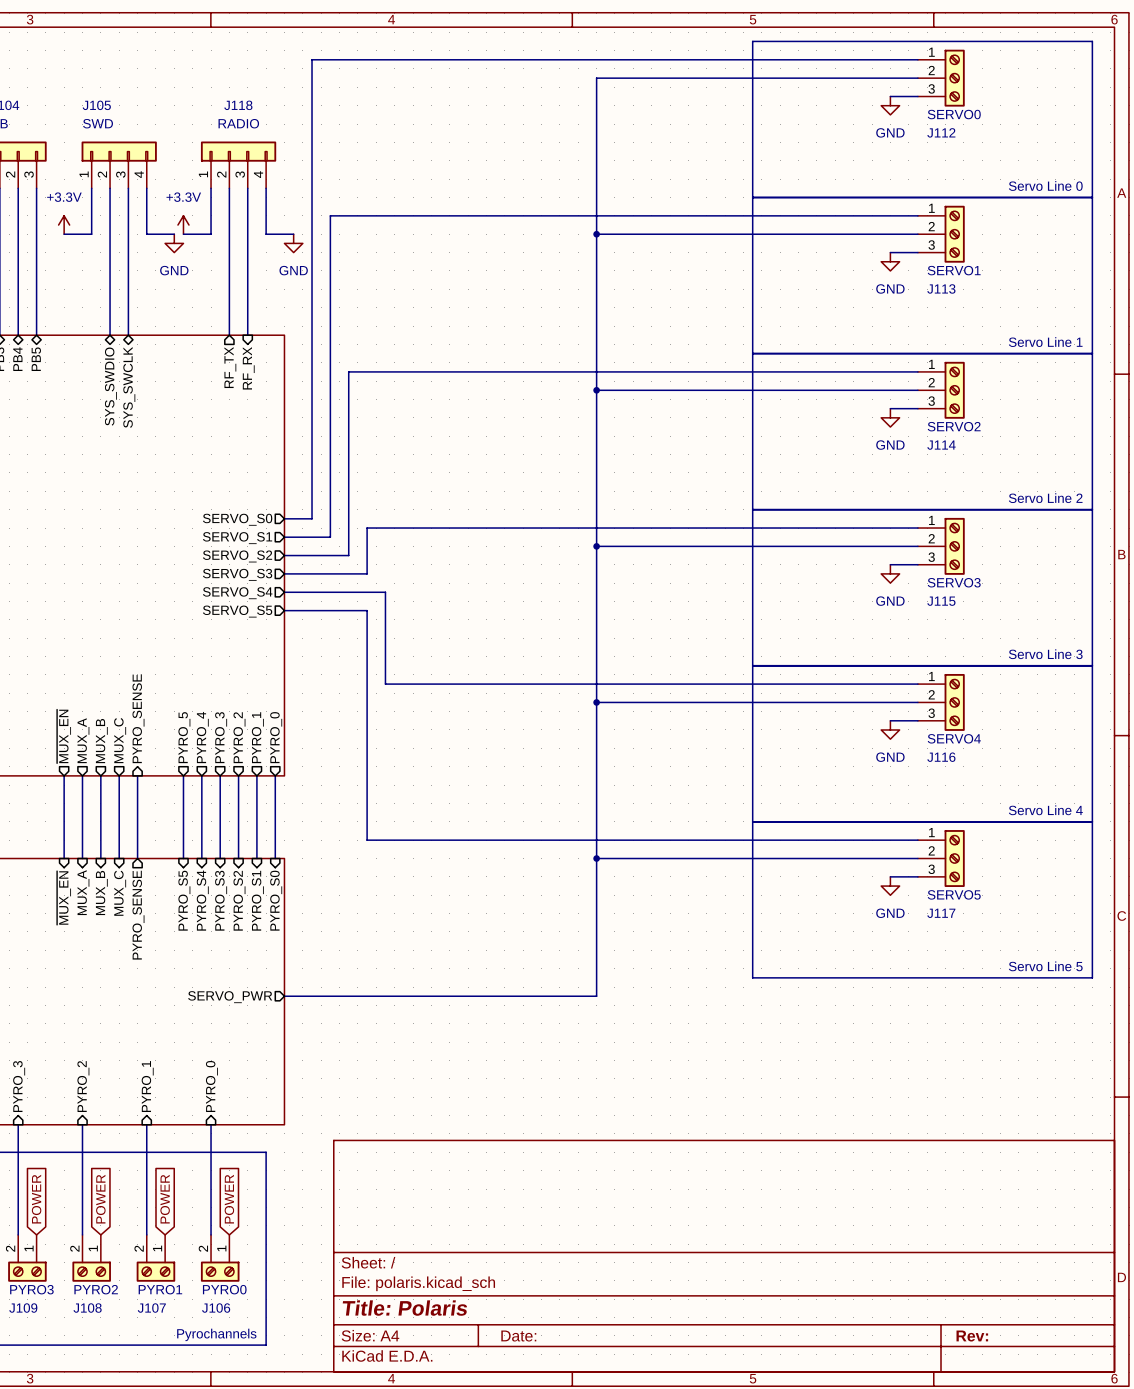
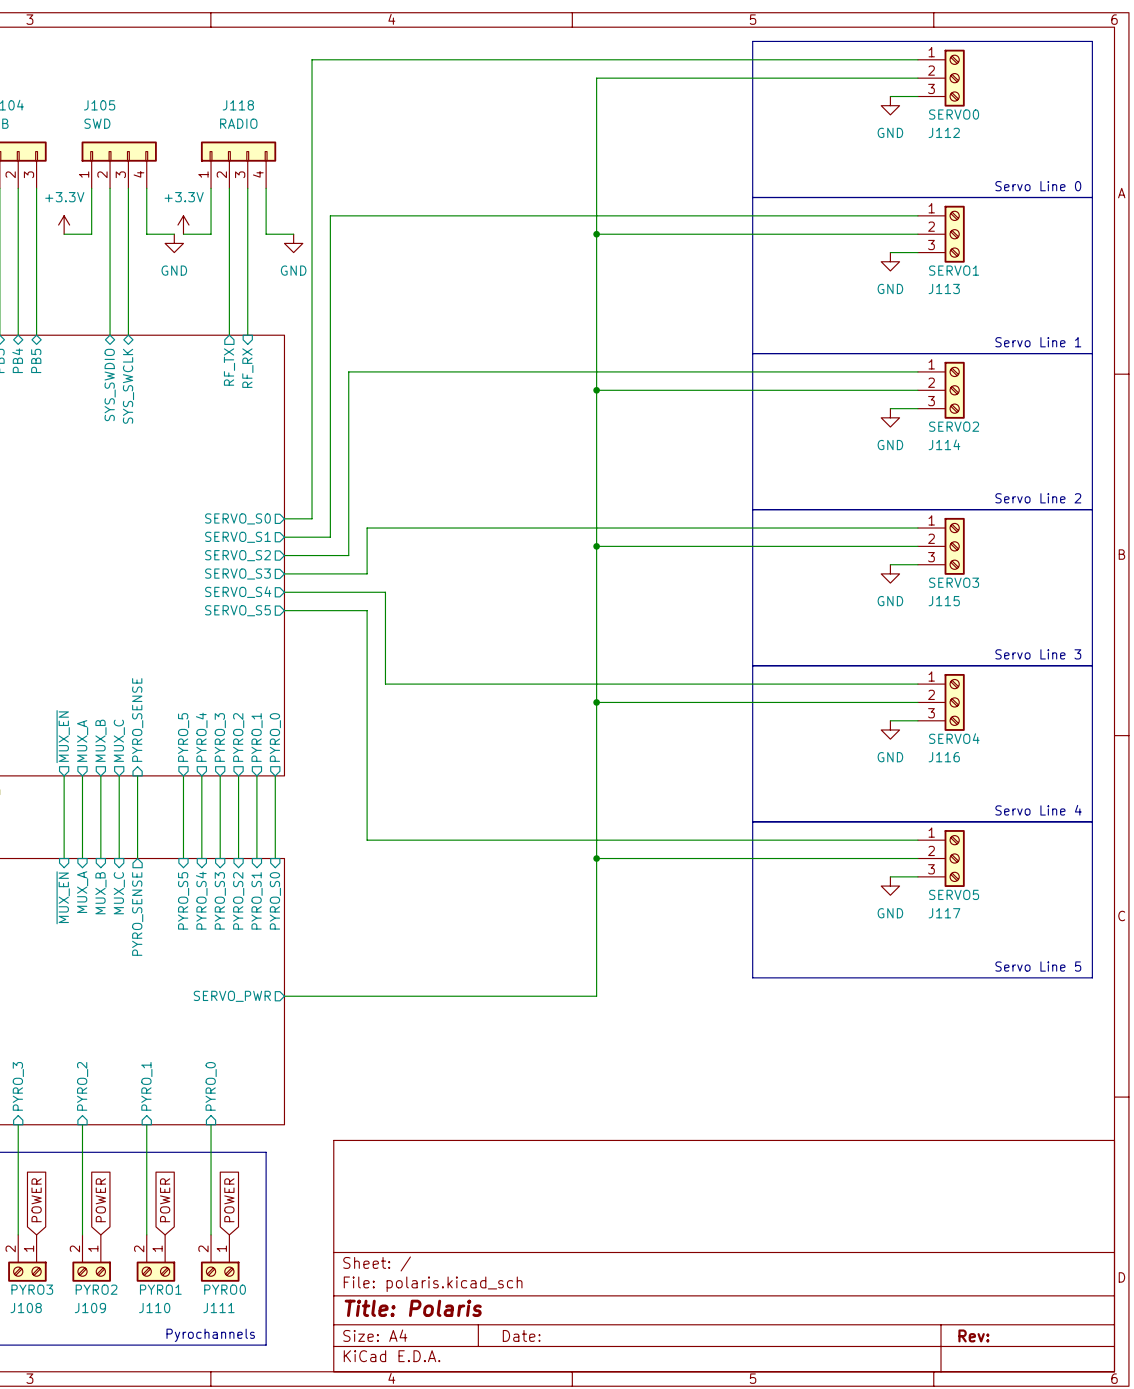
J109 name: J109 (23, 1308) -> J108 (26, 1308)
J108 name: J108 (87, 1308) -> J109 (90, 1308)
J107 name: J107 (151, 1308) -> J110 (154, 1308)
J106 name: J106 (216, 1308) -> J111 (218, 1308)

